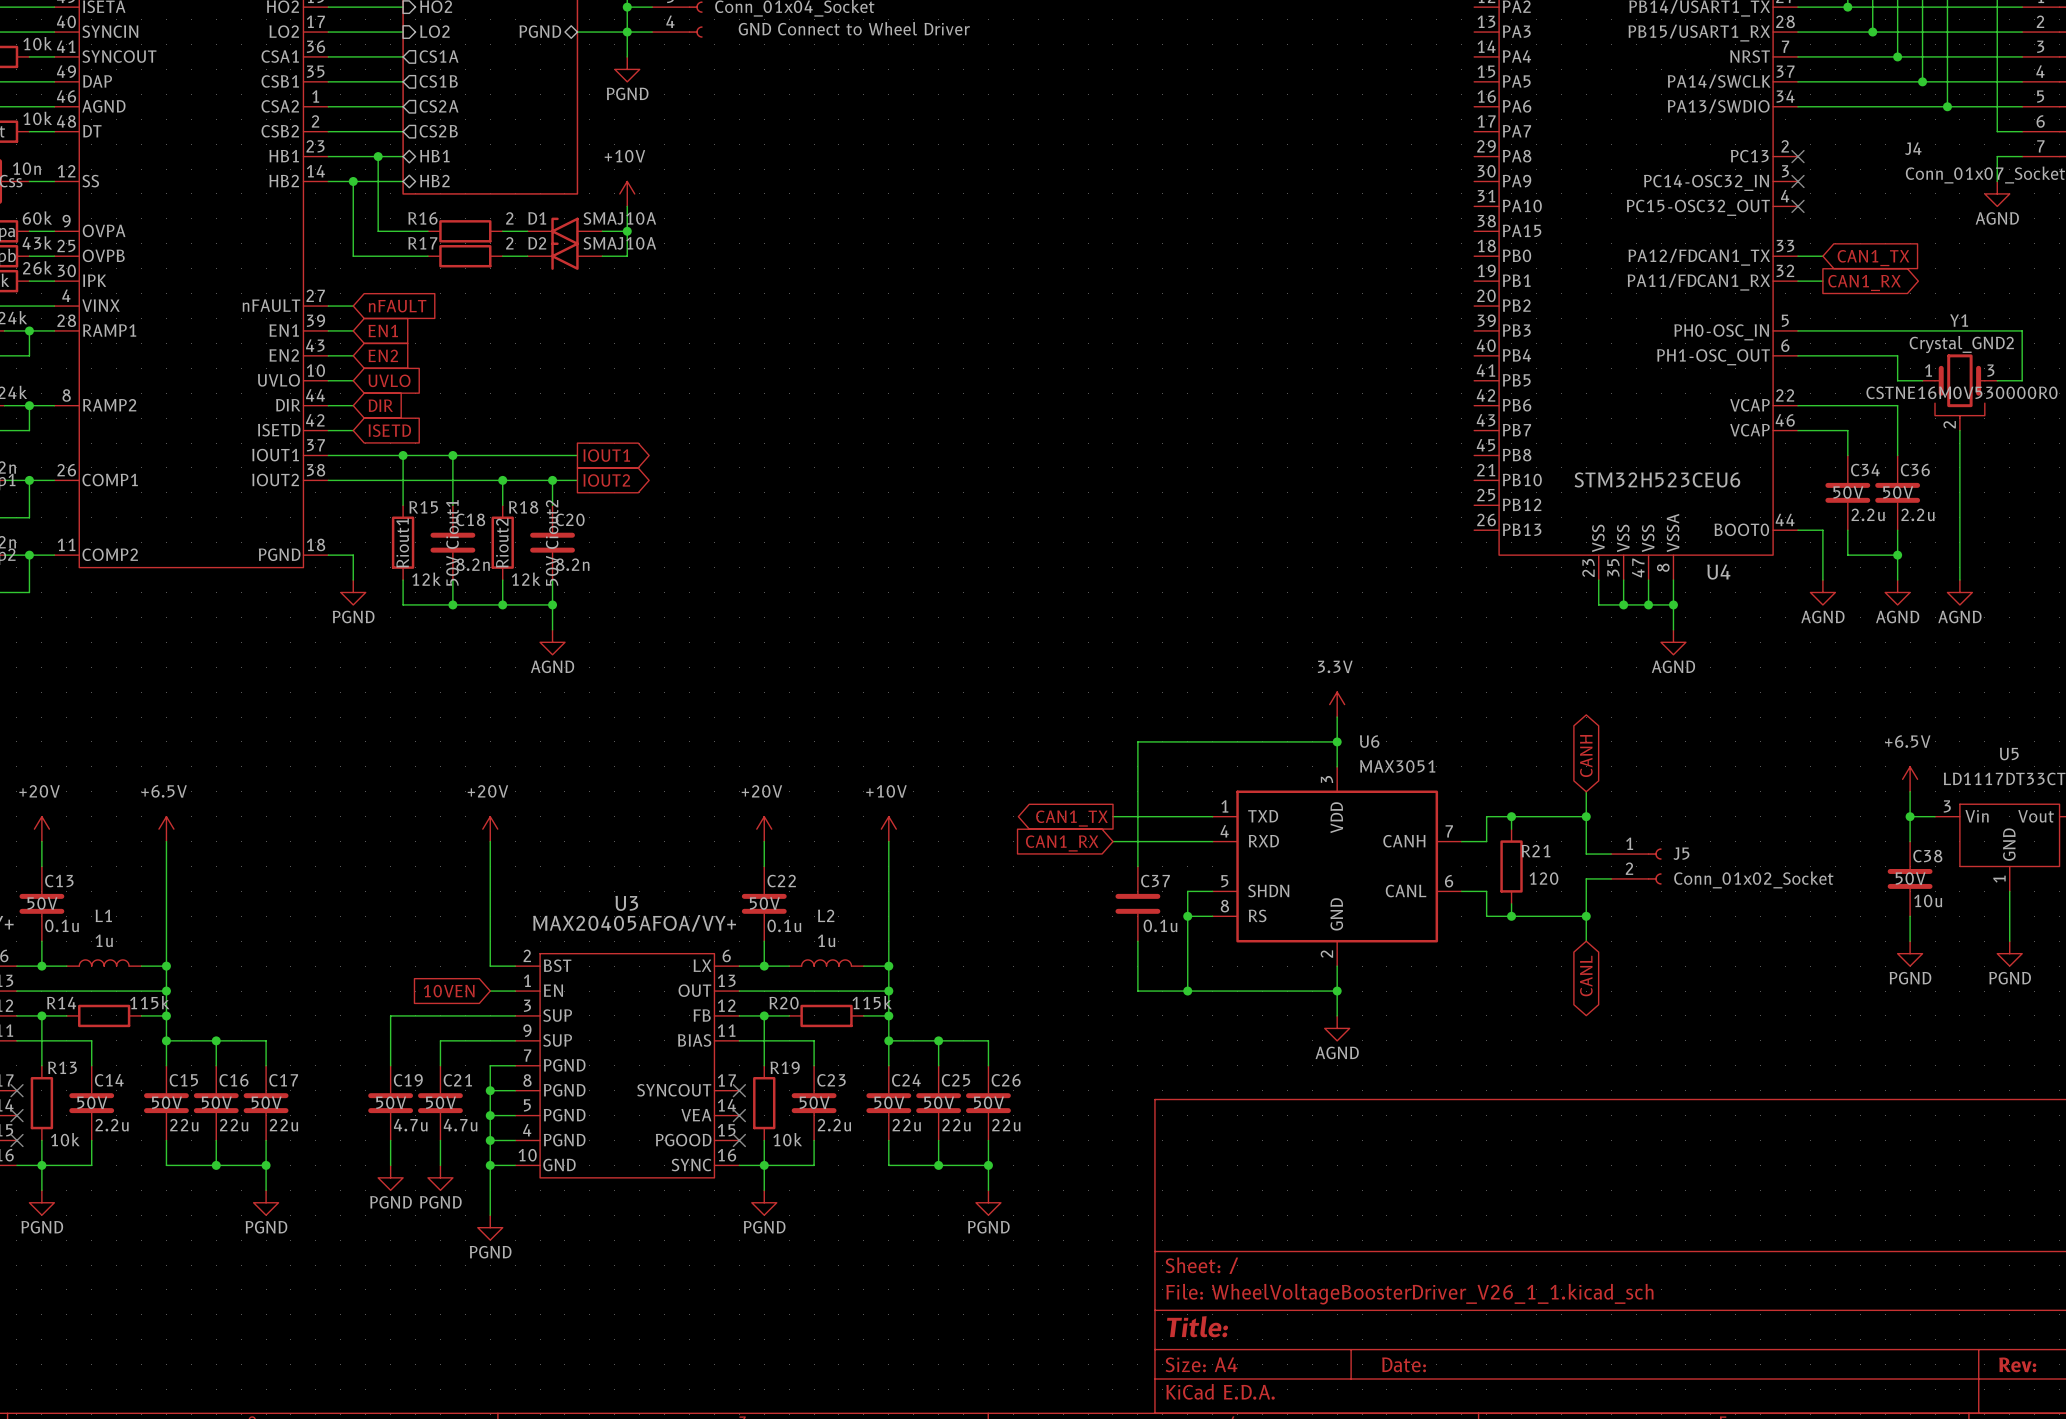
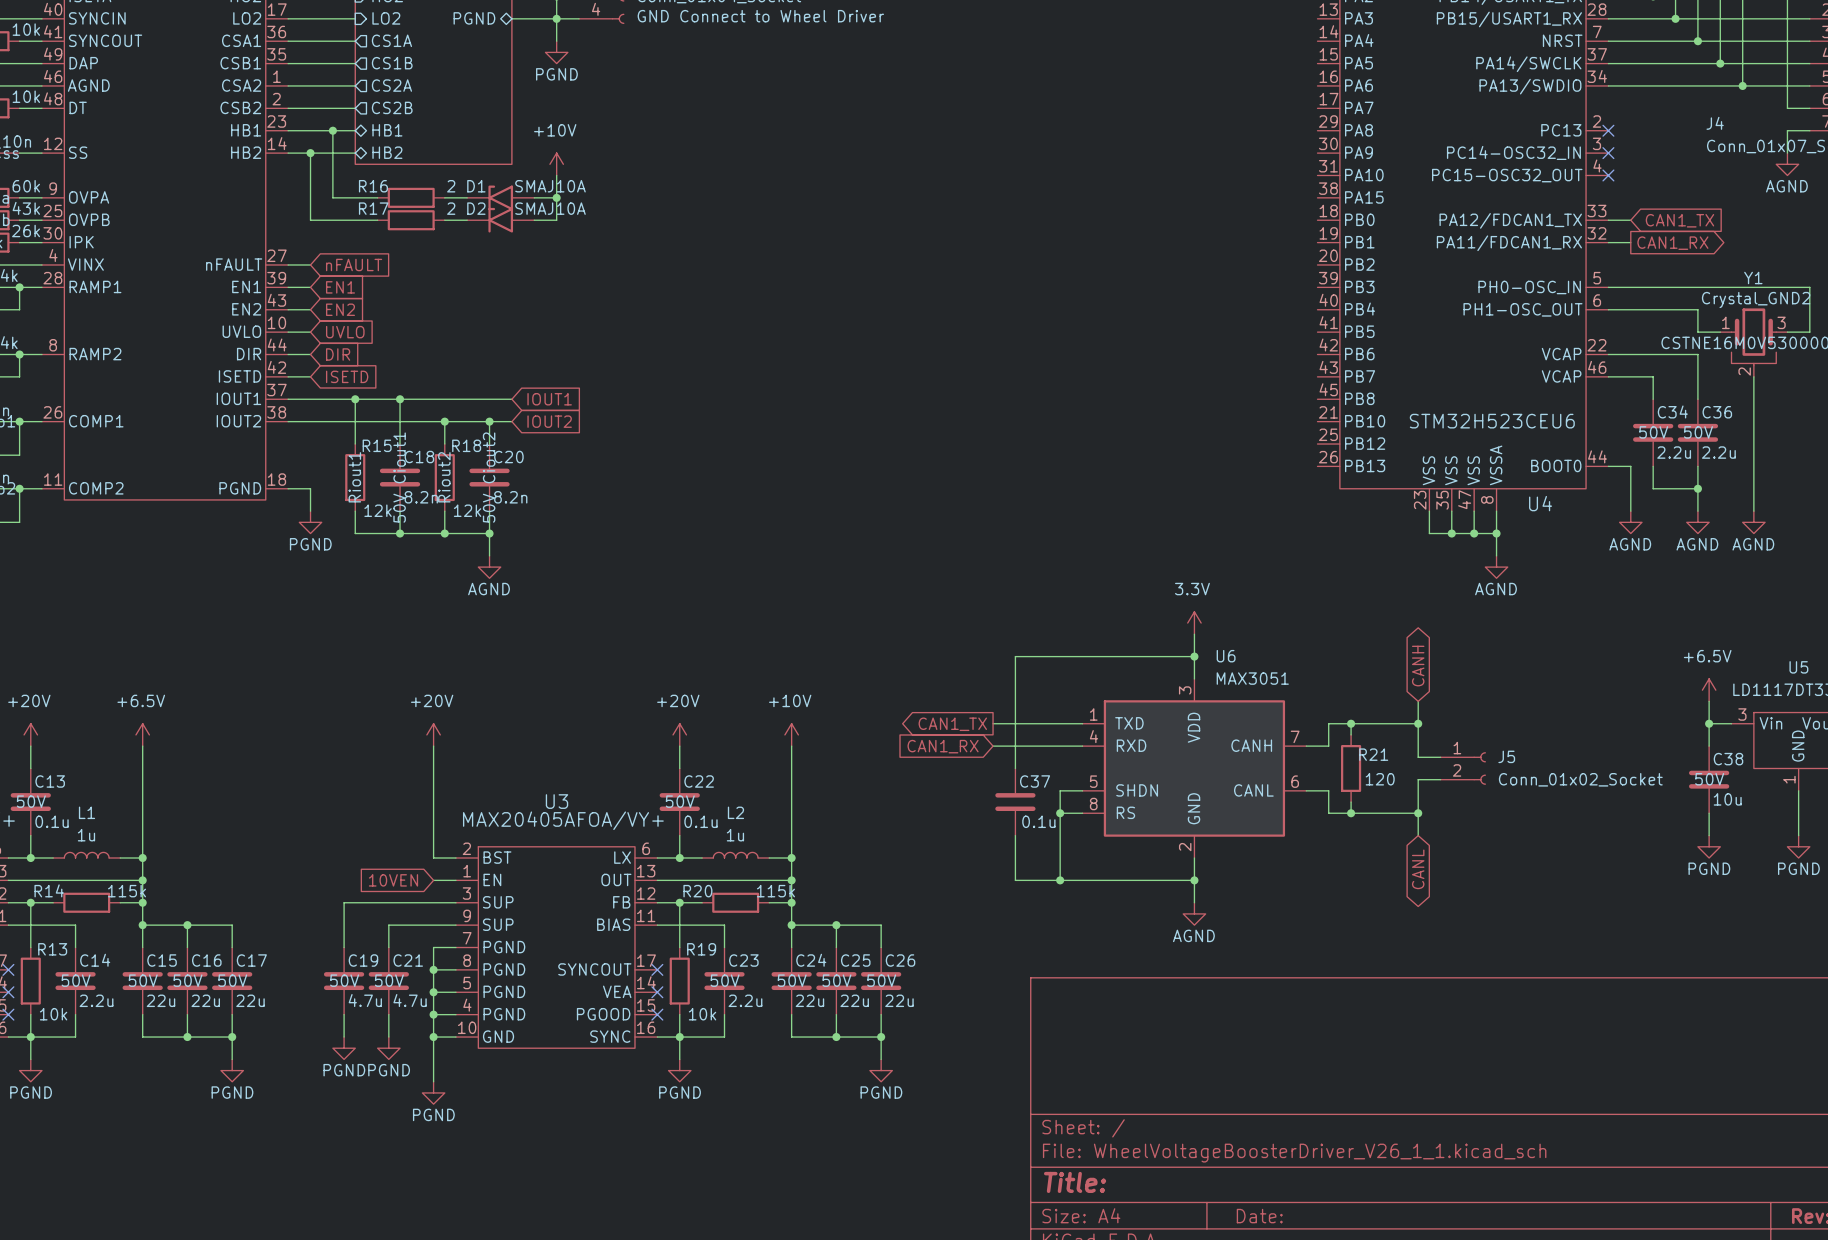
global label shape: output (606, 455) -> input (549, 399)
global label shape: output (606, 480) -> input (549, 421)

